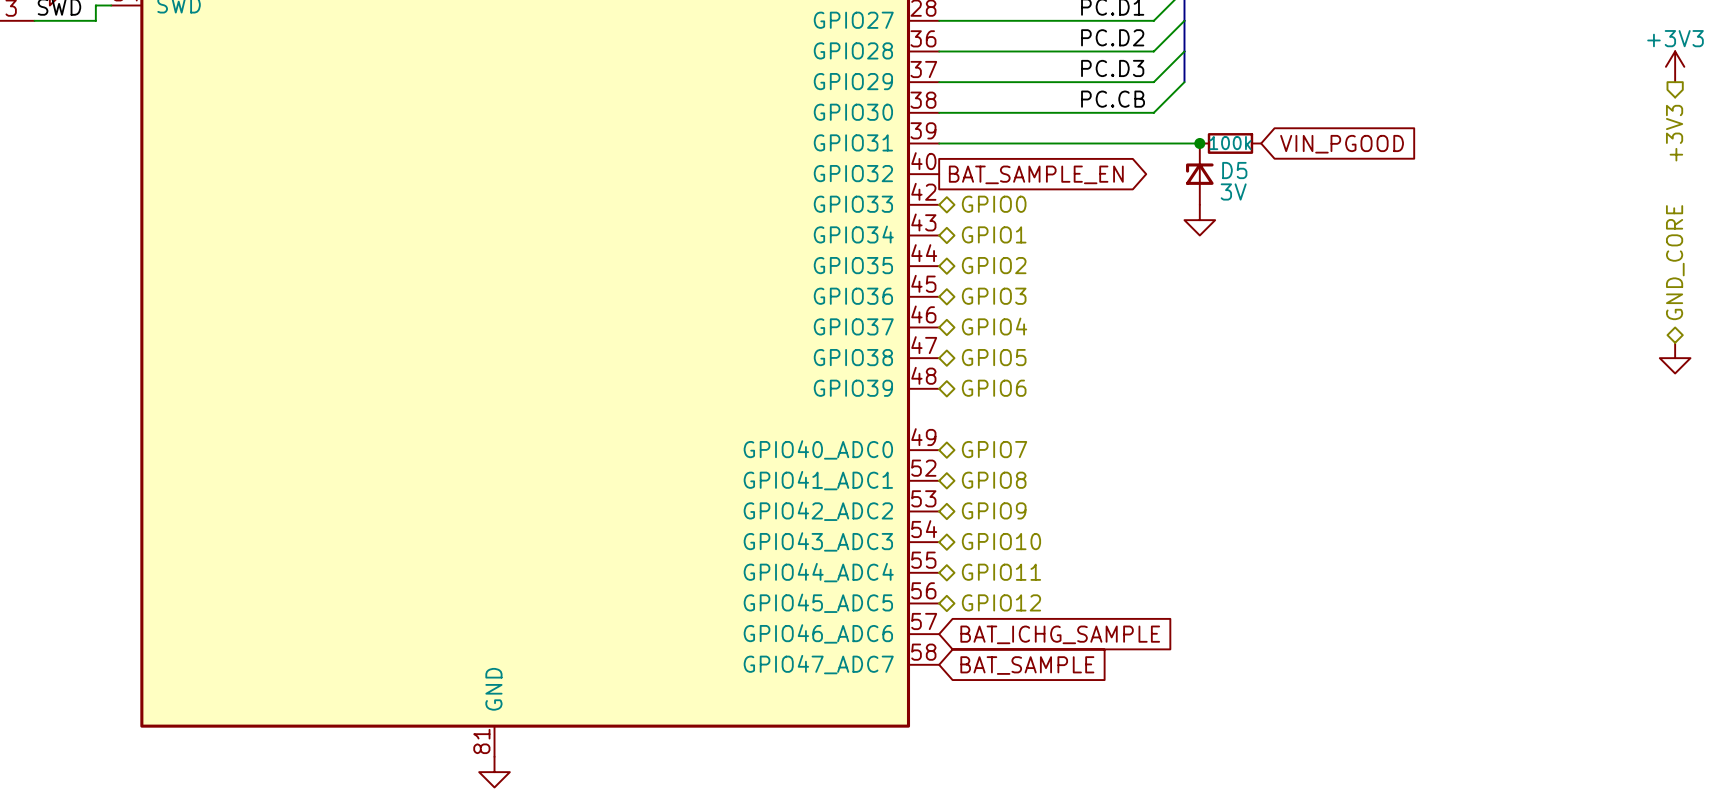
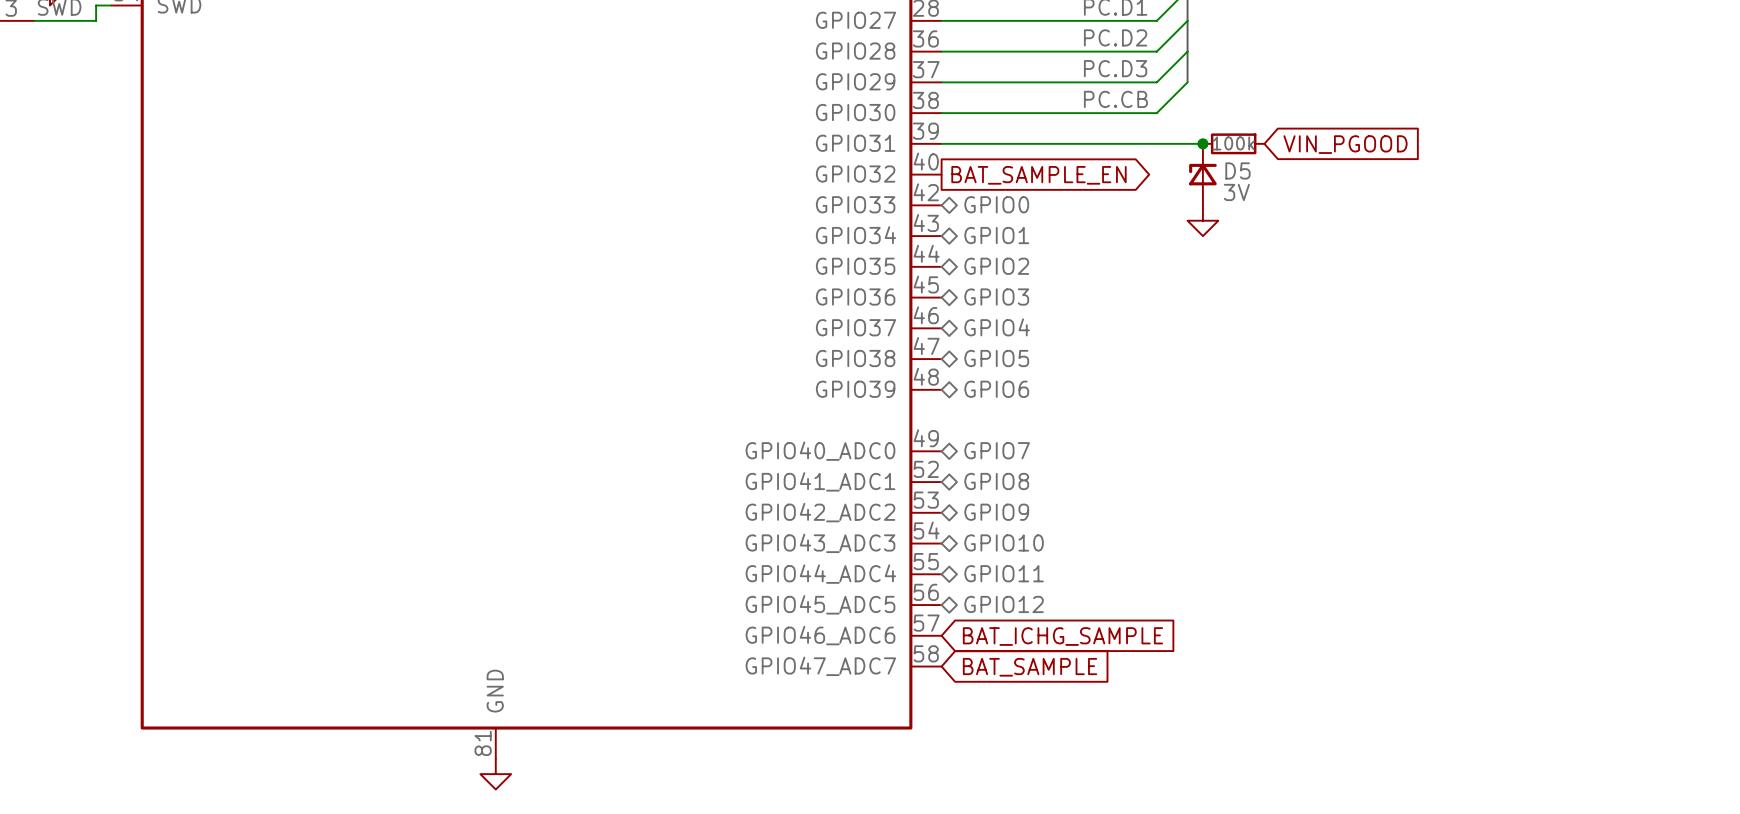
power symbol: +3V3 (1675, 66) -> none
hierarchical label: +3V3 (1674, 133) -> none
hierarchical label: GND_CORE (1675, 262) -> none
power symbol: (1675, 358) -> none

